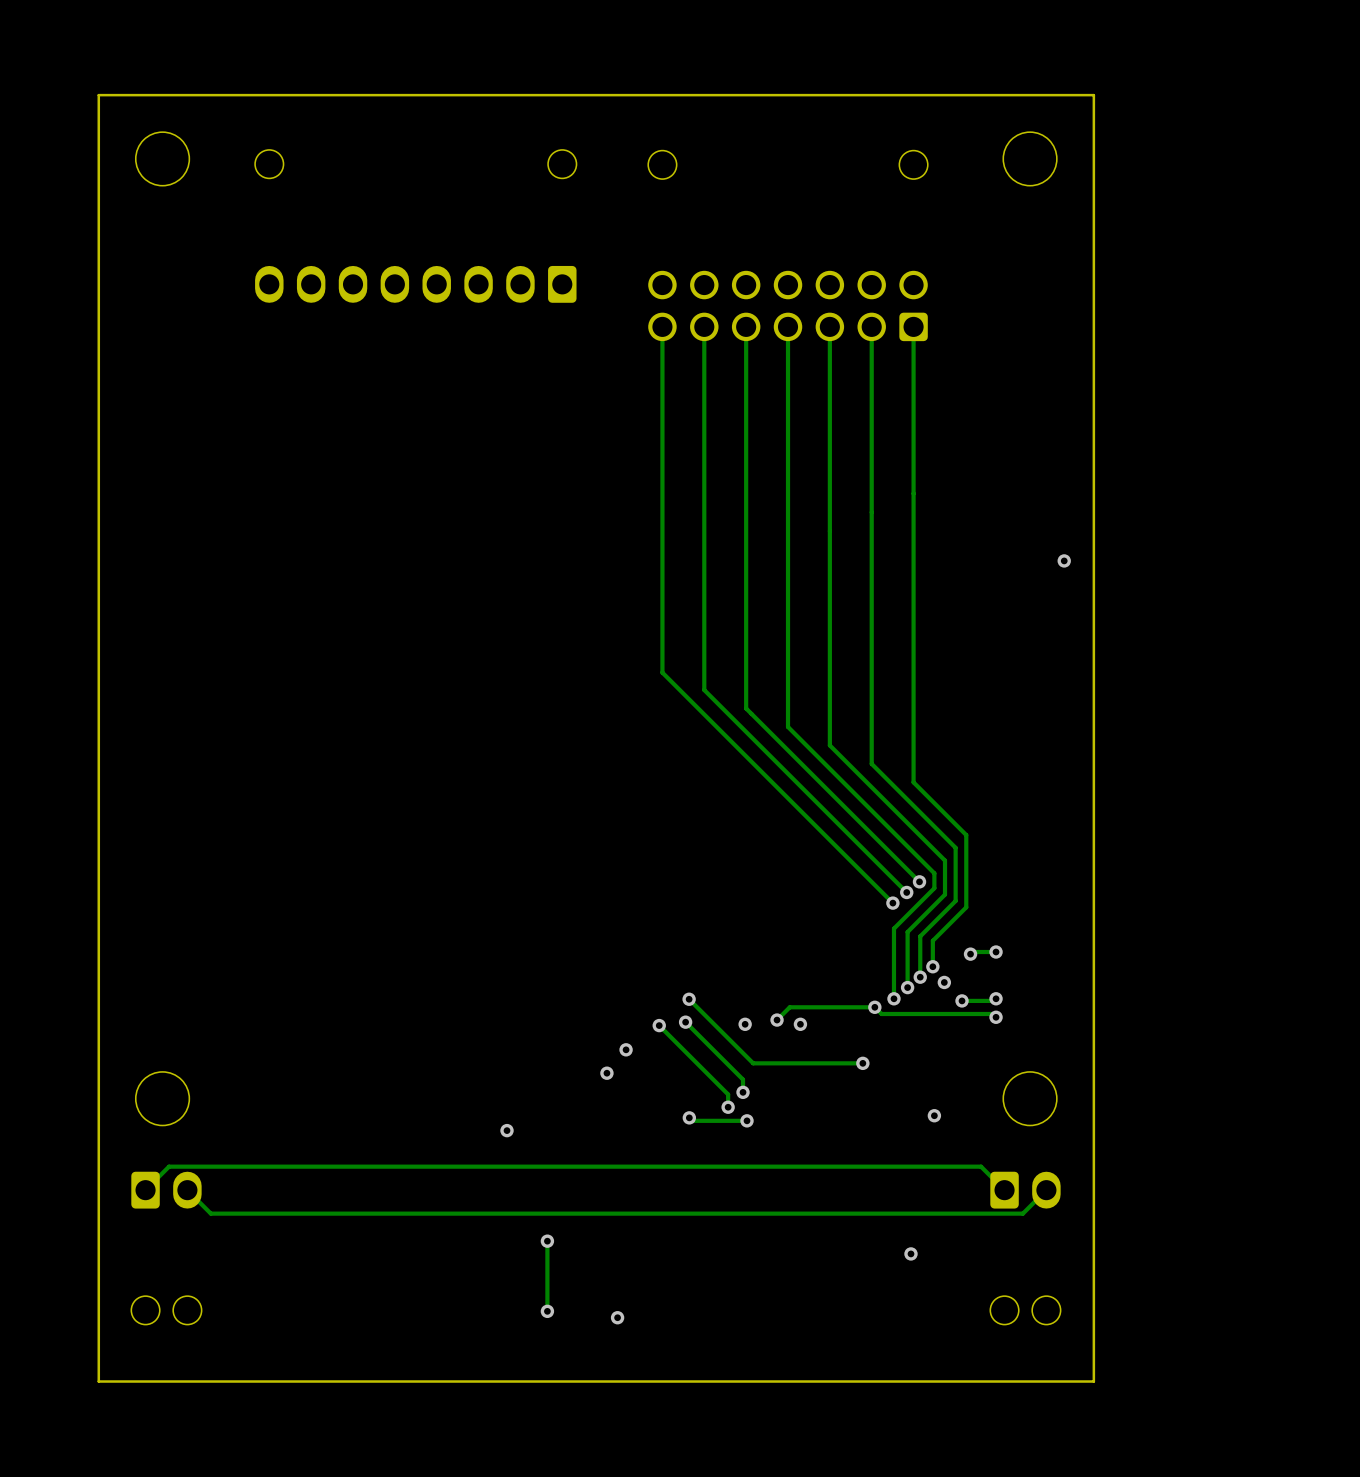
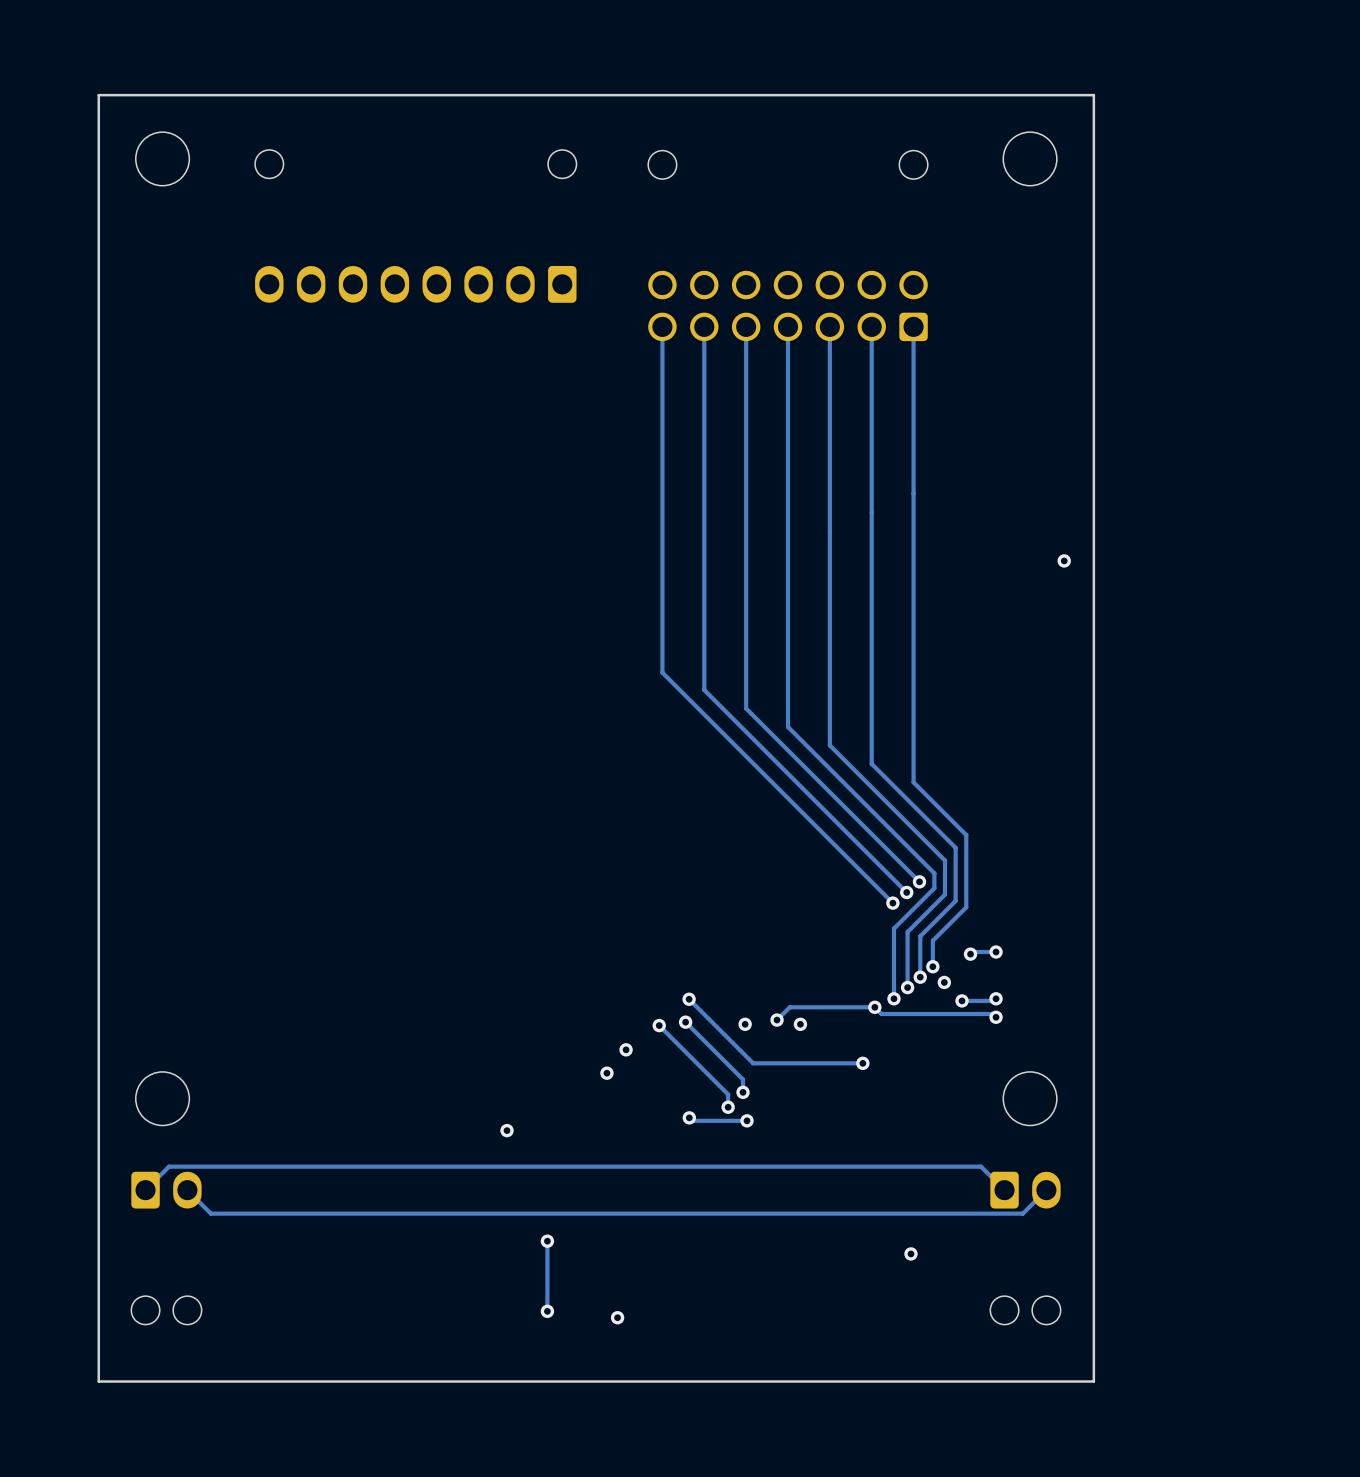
via: (934, 1115) -> none

